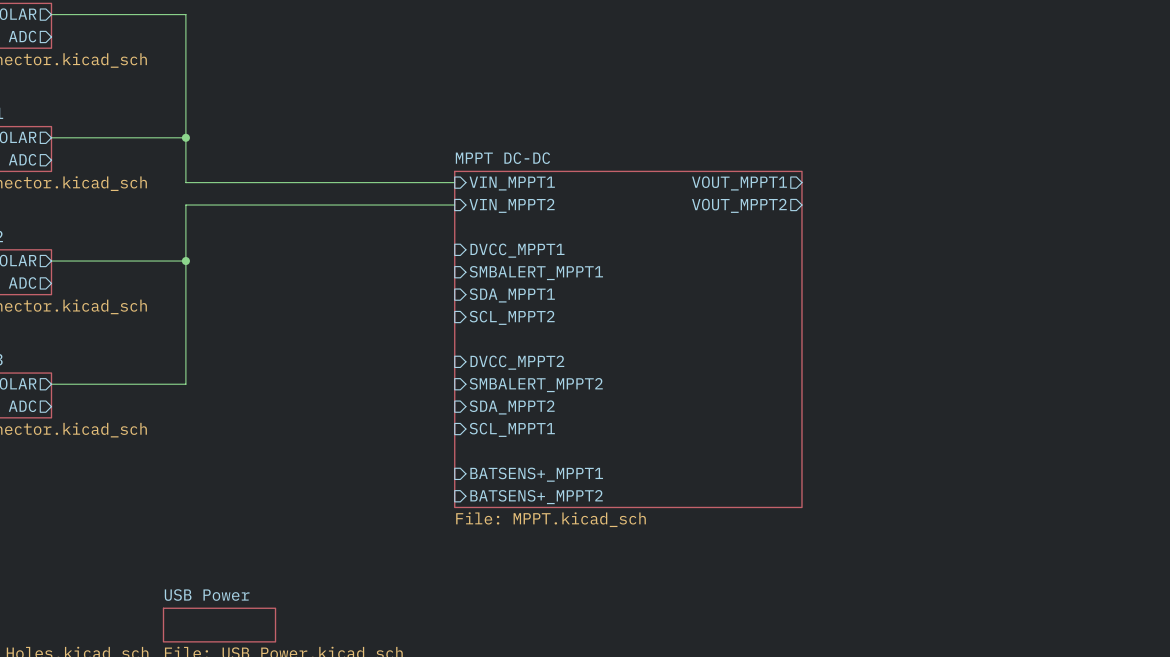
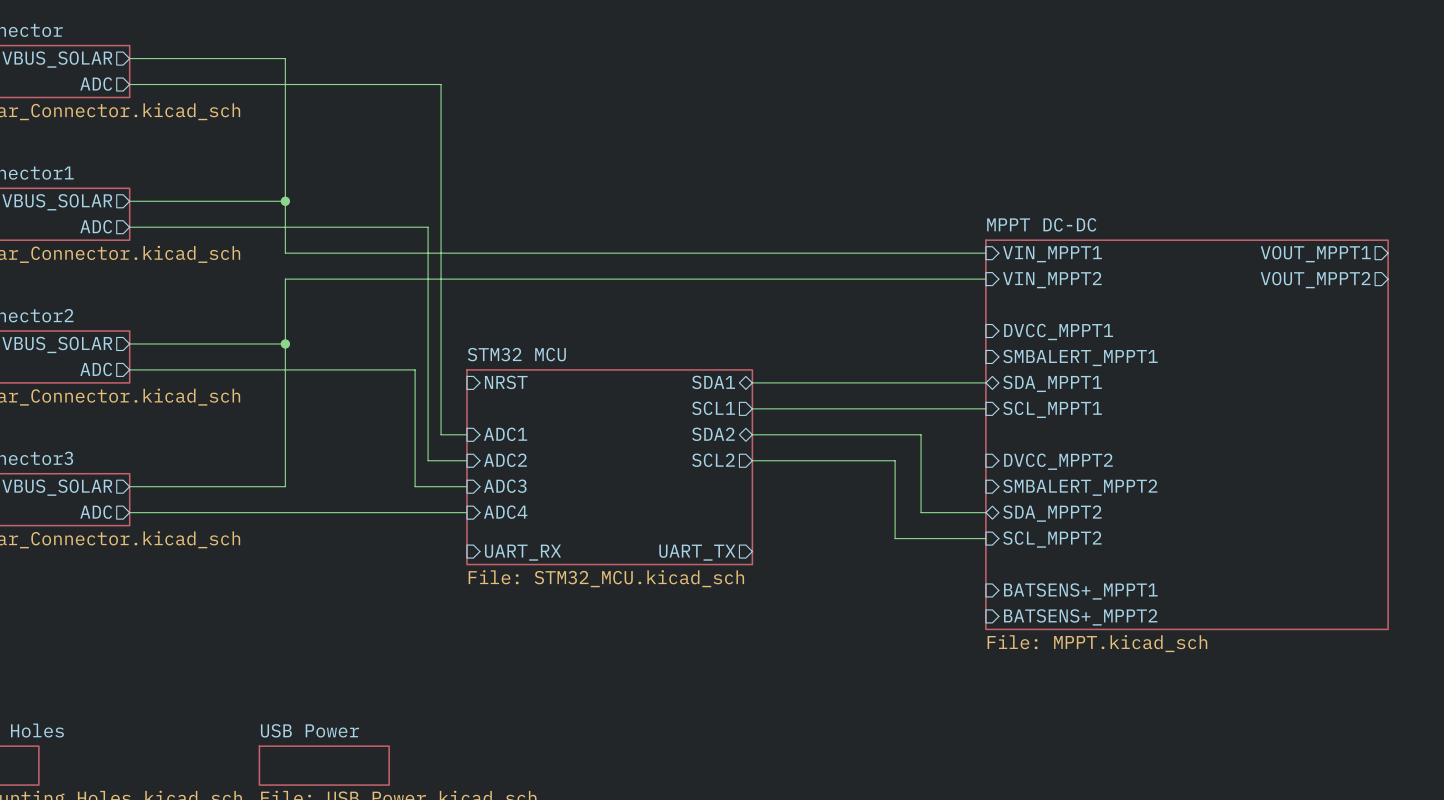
wire: none -> (129, 84) (441, 84) (441, 434) (466, 434)
wire: none -> (129, 227) (428, 227) (428, 460) (466, 460)
wire: none -> (596, 253) (985, 253)
sheet pin: VIN_MPPT1 (512, 183) -> none
sheet pin: VOUT_MPPT1 (739, 183) -> none
sheet pin: none -> VIN_MPPT1 (1052, 254)
sheet pin: none -> VOUT_MPPT1 (1315, 254)
wire: none -> (596, 279) (985, 279)
sheet pin: VIN_MPPT2 (512, 205) -> none
sheet pin: VOUT_MPPT2 (739, 205) -> none
sheet pin: none -> VIN_MPPT2 (1052, 280)
sheet pin: none -> VOUT_MPPT2 (1315, 280)
sheet pin: DVCC_MPPT1 (517, 250) -> none
sheet pin: none -> DVCC_MPPT1 (1058, 331)
sheet pin: SMBALERT_MPPT1 (536, 273) -> none
sheet pin: none -> SMBALERT_MPPT1 (1080, 357)
wire: none -> (129, 369) (415, 369) (415, 486) (466, 486)
sheet pin: none -> NRST (506, 382)
wire: none -> (752, 382) (985, 382)
sheet pin shape: input (512, 295) -> bidirectional (713, 382)
sheet pin: SDA_MPPT1 (512, 295) -> SDA1 (713, 382)
sheet pin: none -> SDA_MPPT1 (1052, 383)
sheet pin: none -> SCL1 (713, 408)
sheet pin: SCL_MPPT2 (512, 317) -> none
wire: none -> (752, 408) (985, 408)
sheet pin: none -> SCL_MPPT1 (1052, 409)
sheet pin: none -> ADC1 (505, 434)
sheet pin: none -> SDA2 (713, 434)
wire: none -> (752, 434) (921, 434) (921, 512) (985, 512)
sheet MPPT DC-DC: File: MPPT.kicad_sch (628, 339) -> none
sheet MPPT DC-DC: none -> File: MPPT.kicad_sch (1187, 434)
sheet pin: none -> ADC2 (505, 460)
sheet pin: none -> SCL2 (713, 460)
wire: none -> (752, 460) (895, 460) (895, 538) (985, 538)
sheet pin: DVCC_MPPT2 (517, 362) -> none
sheet pin: none -> DVCC_MPPT2 (1058, 461)
sheet STM32 MCU: none -> File: STM32_MCU.kicad_sch (609, 467)
sheet pin: none -> ADC3 (505, 486)
sheet pin: SMBALERT_MPPT2 (536, 385) -> none
sheet pin: none -> SMBALERT_MPPT2 (1080, 487)
wire: none -> (129, 512) (466, 512)
sheet pin: none -> ADC4 (505, 512)
sheet pin: SDA_MPPT2 (512, 407) -> none
sheet pin: none -> SDA_MPPT2 (1052, 513)
sheet pin: SCL_MPPT1 (512, 429) -> none
sheet pin: none -> SCL_MPPT2 (1052, 539)
sheet pin: none -> UART_RX (523, 552)
sheet pin: none -> UART_TX (697, 552)
sheet pin: BATSENS+_MPPT1 (536, 474) -> none
sheet pin: none -> BATSENS+_MPPT1 (1080, 591)
sheet pin: BATSENS+_MPPT2 (536, 497) -> none
sheet pin: none -> BATSENS+_MPPT2 (1080, 617)

